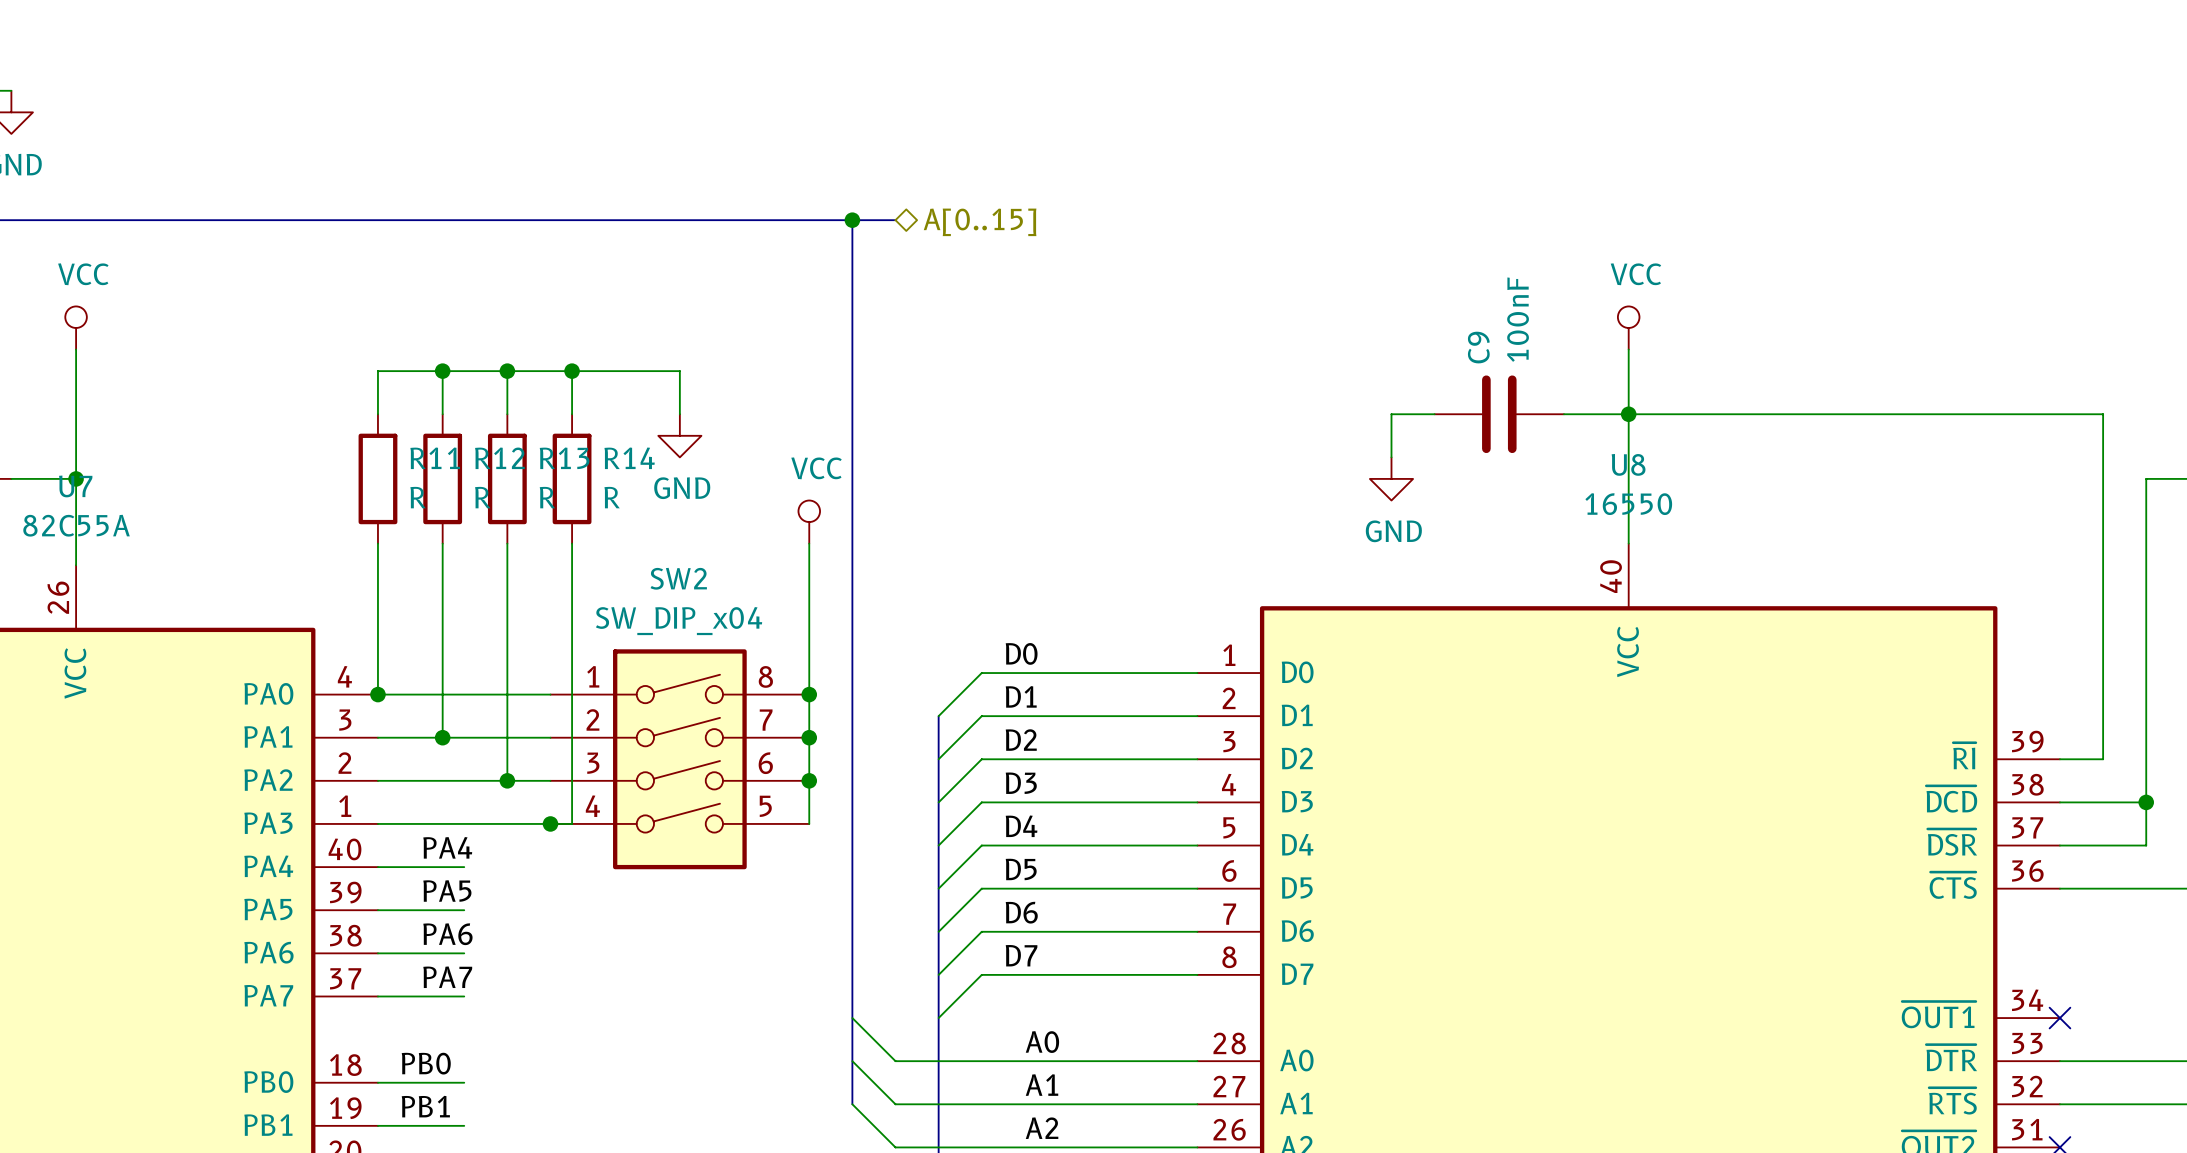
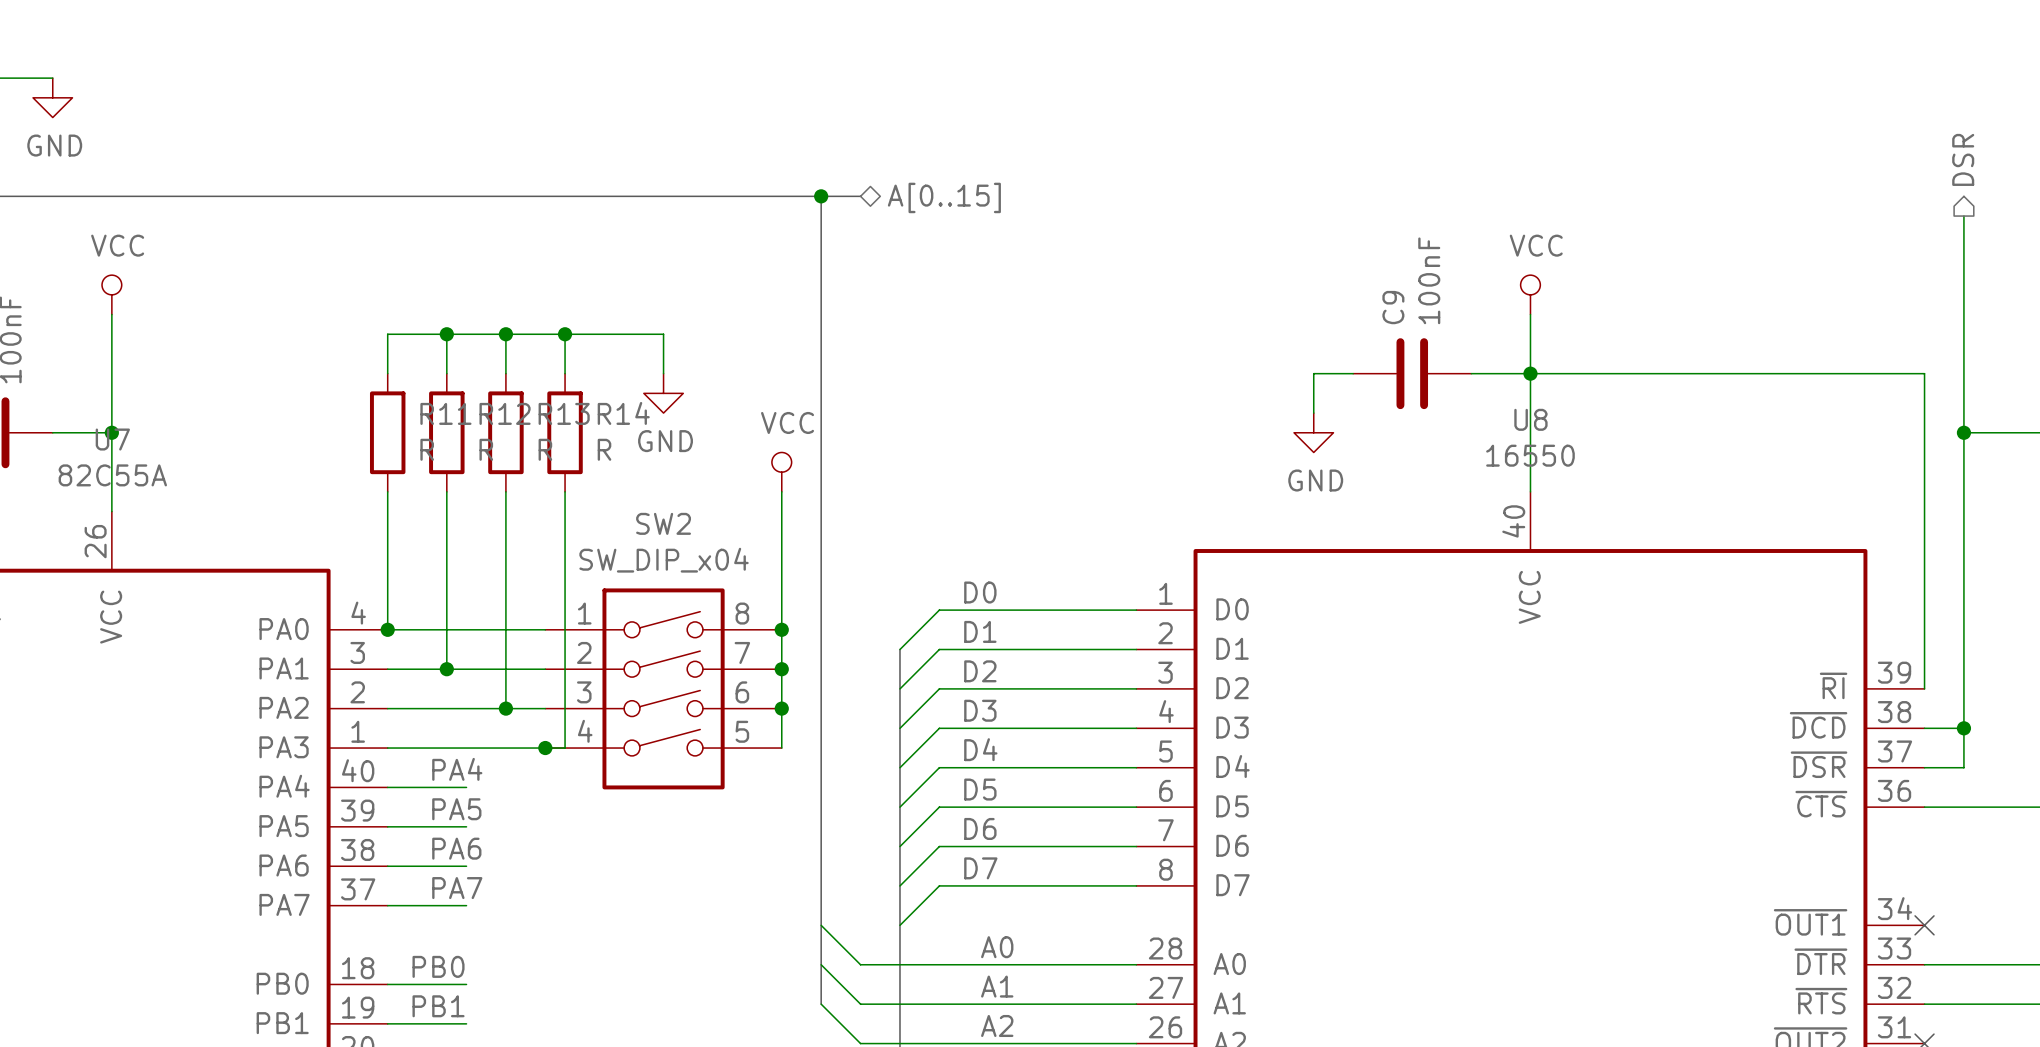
hierarchical label: none -> DSR (1963, 159)
wire: (2059, 414) (2103, 414) -> (1963, 216) (1963, 373)
wire: none -> (1924, 373) (1924, 688)
junction: none -> (1963, 432)
wire: (2146, 478) (2146, 845) (2103, 845) -> (2003, 432) (1963, 432)
wire: (2059, 759) (2103, 759) -> (1963, 767) (1963, 688)
wire: (2103, 802) (2146, 802) -> none
junction position: (2146, 802) -> (1963, 728)

